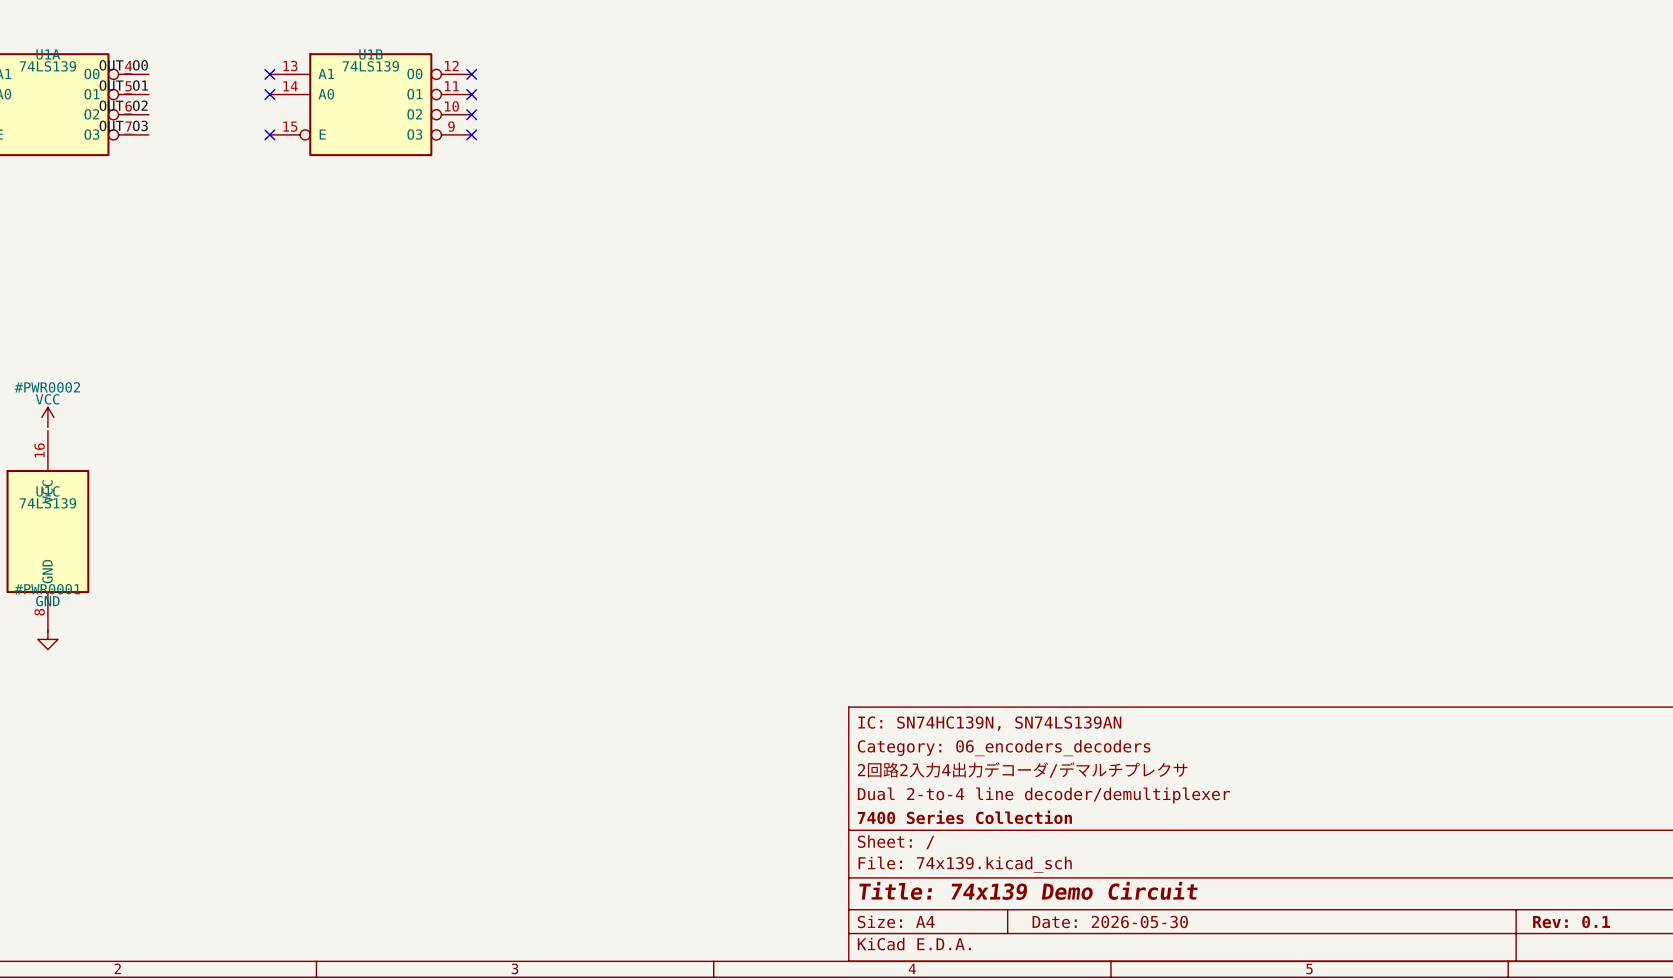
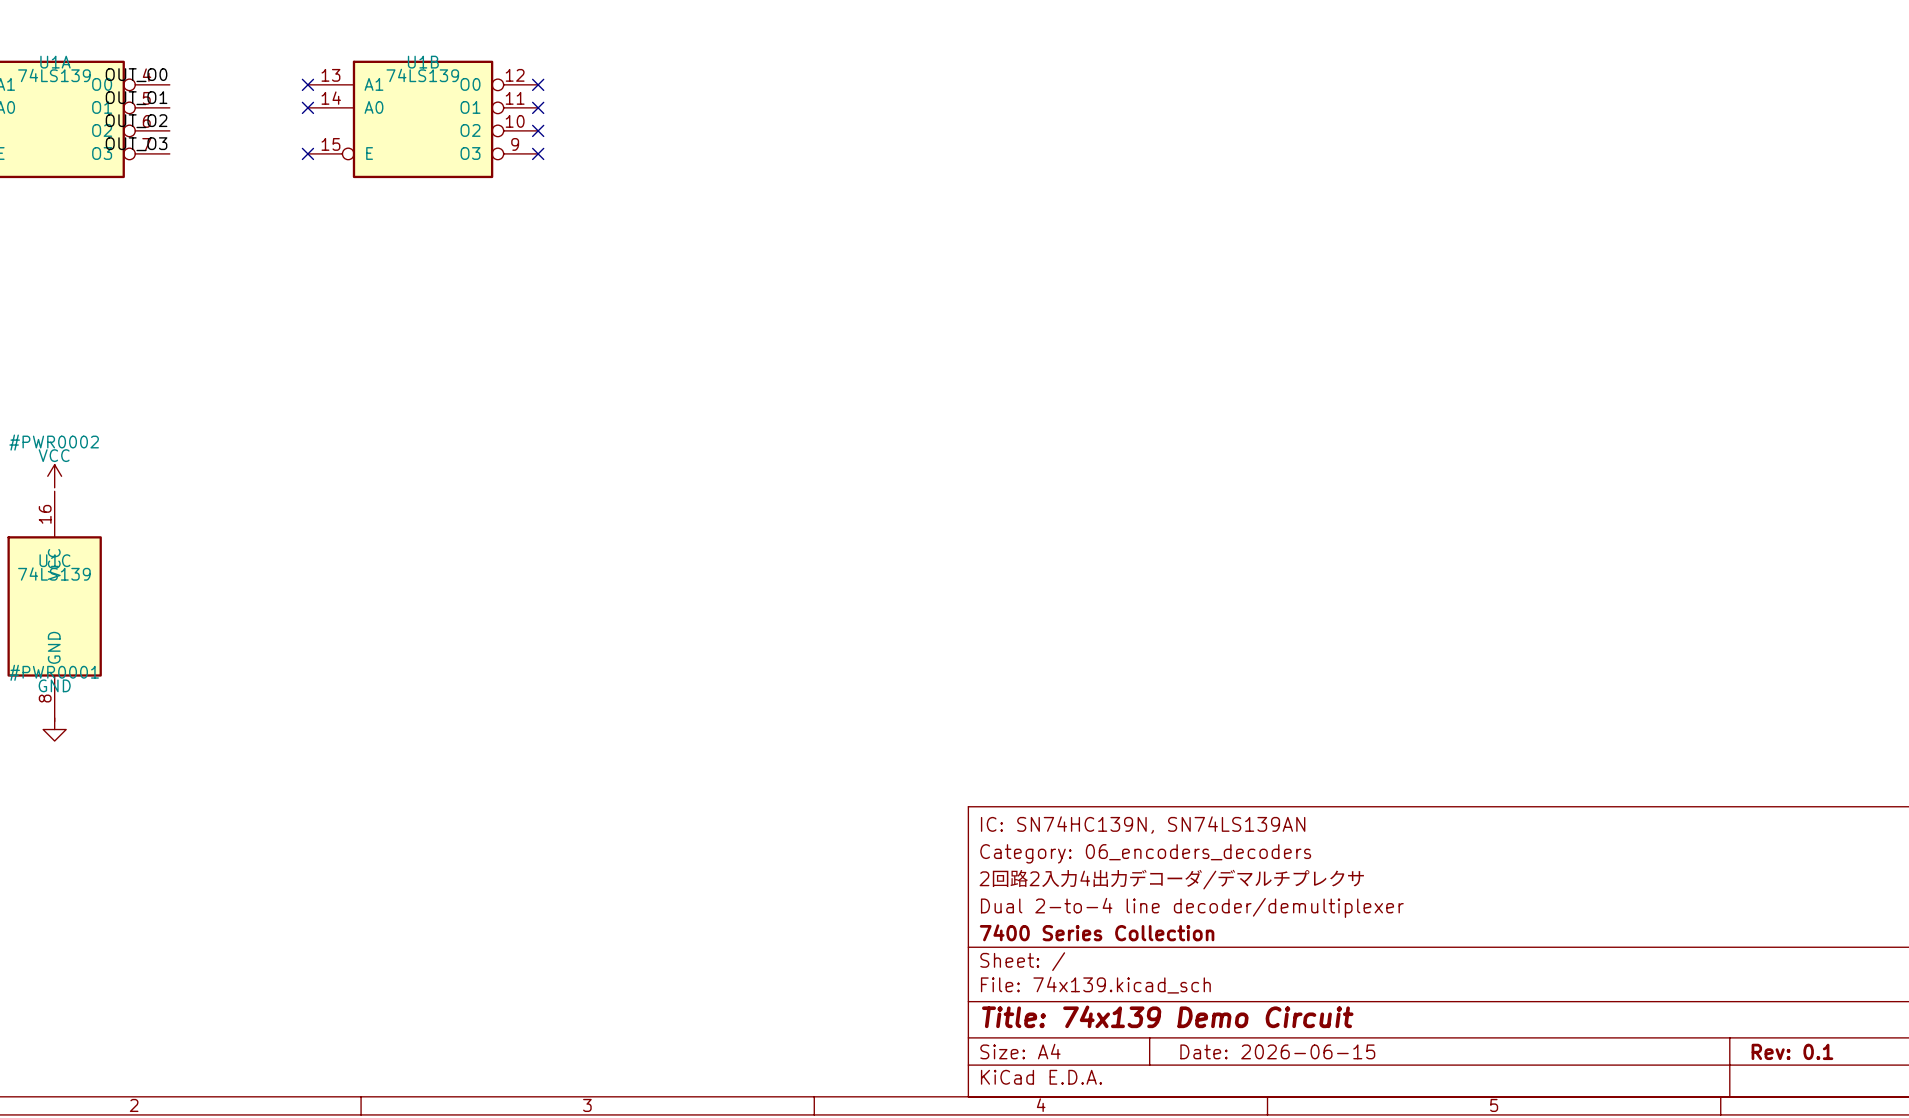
title block: Date: 2026-05-30 (1110, 921) -> Date: 2026-06-15 (1277, 1051)

